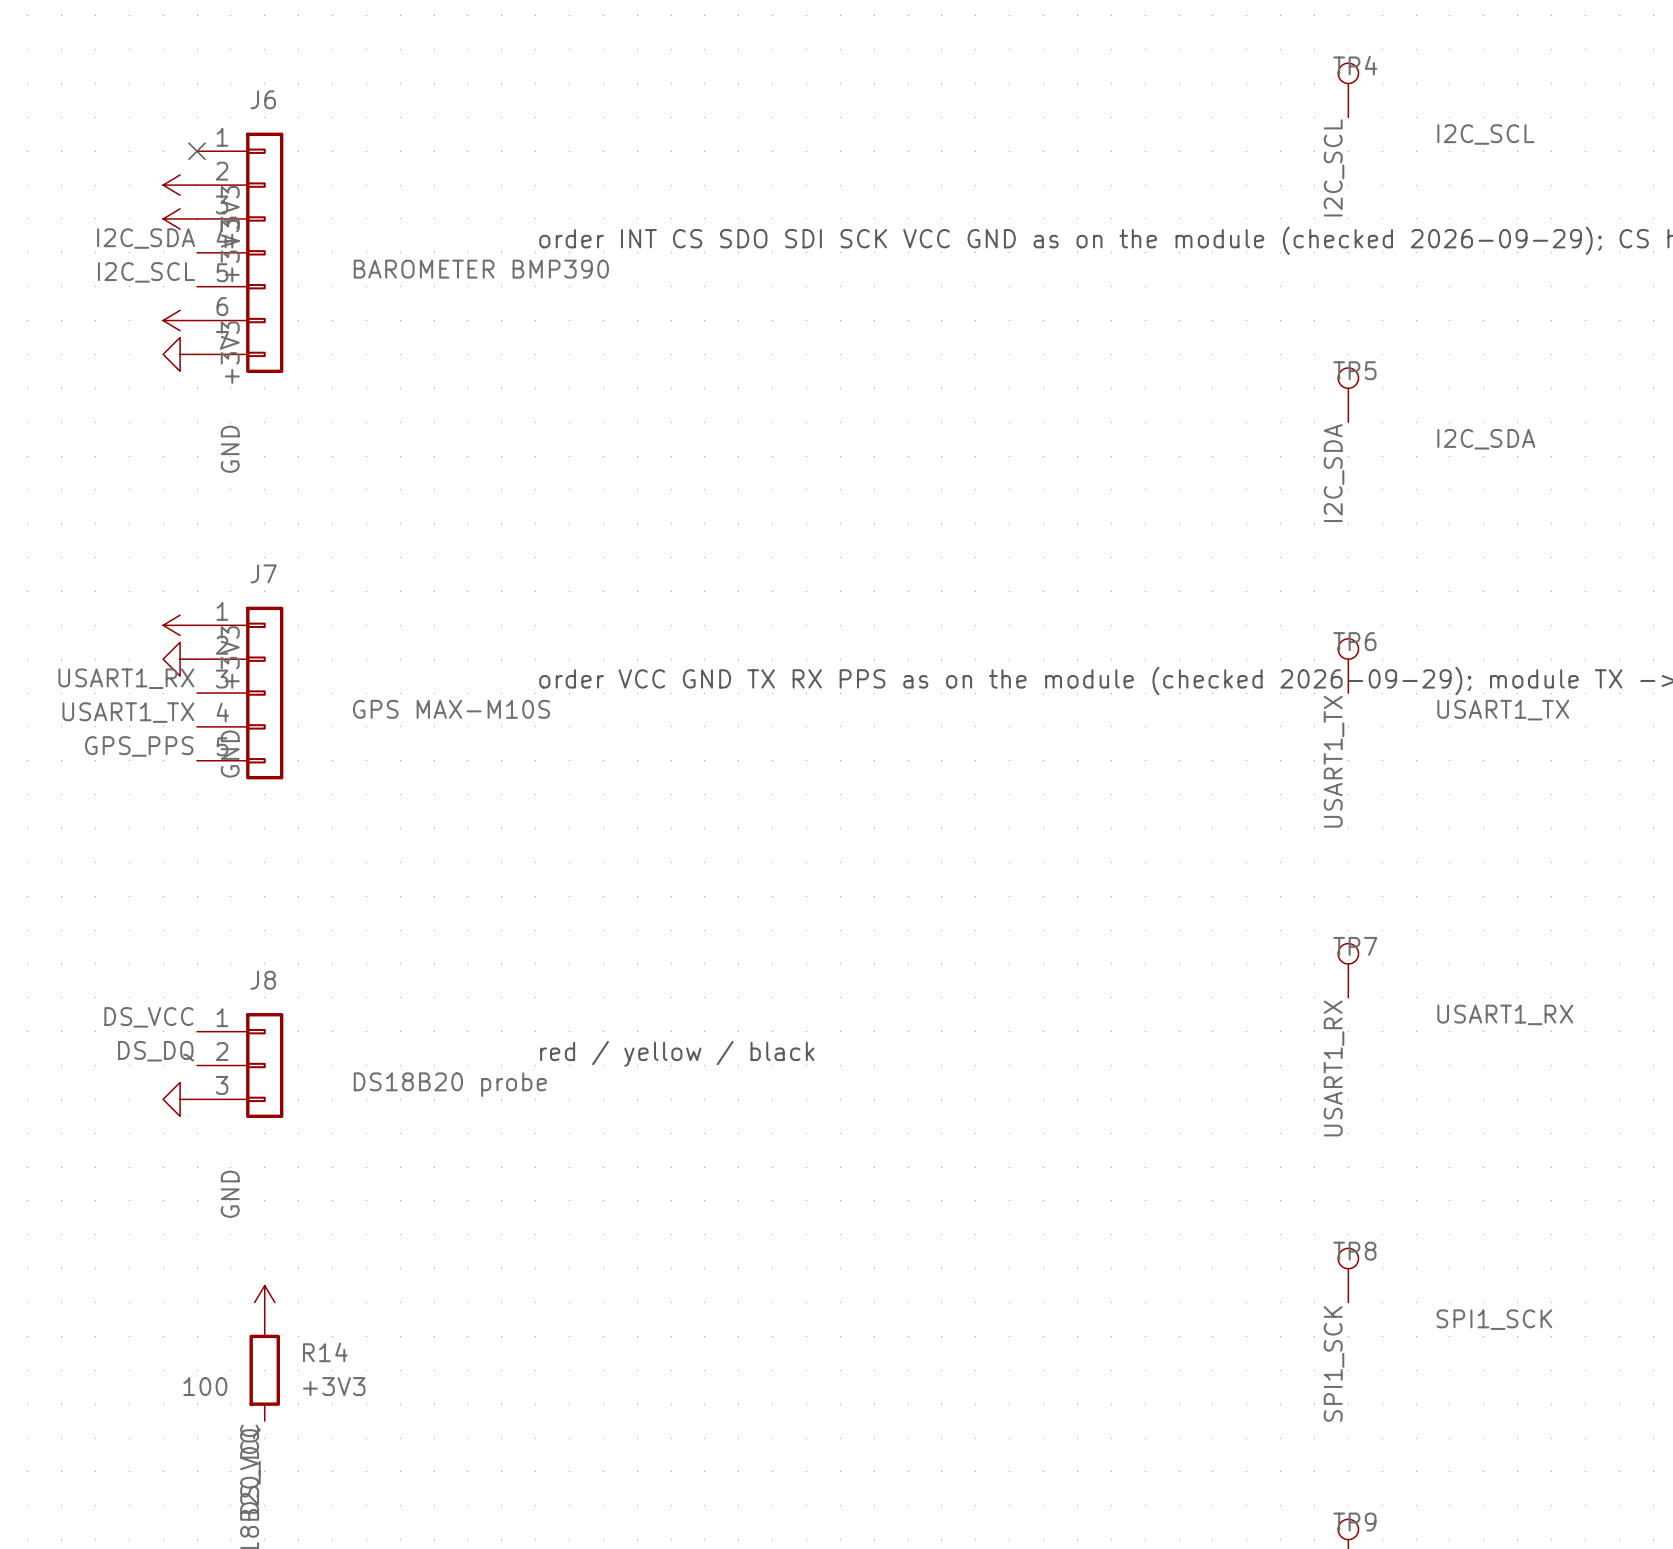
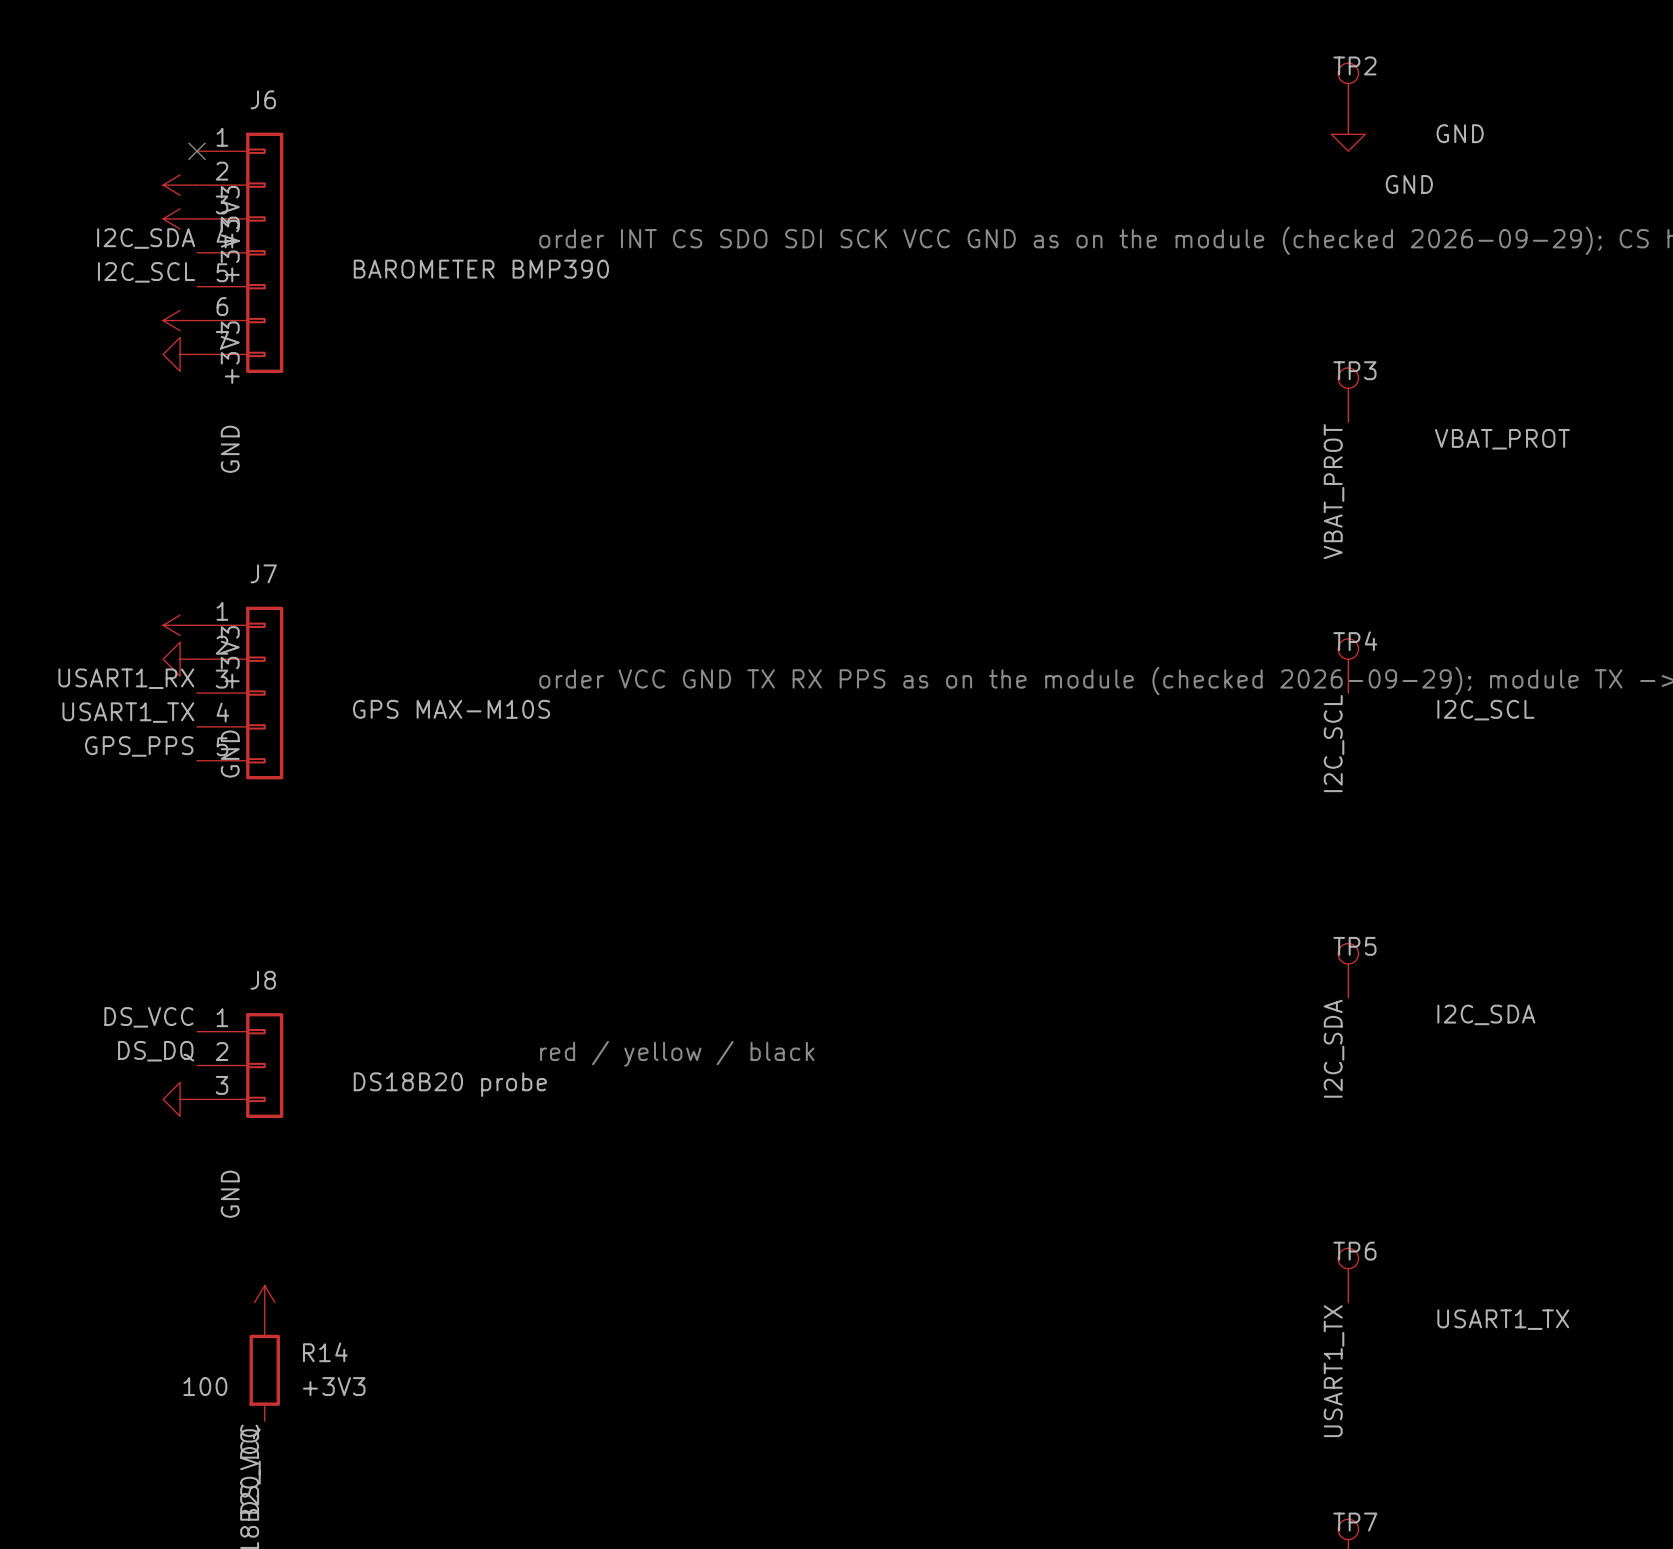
TP4 name: TP4 (1355, 65) -> TP2 (1354, 65)
power symbol: none -> GND (1348, 134)
TP4 value: I2C_SCL (1485, 134) -> GND (1460, 133)
label: I2C_SCL (1334, 167) -> none
TP5 name: TP5 (1354, 370) -> TP3 (1354, 370)
TP5 value: I2C_SDA (1486, 439) -> VBAT_PROT (1502, 439)
label: I2C_SDA (1334, 473) -> VBAT_PROT (1334, 491)
TP6 name: TP6 (1354, 641) -> TP4 (1355, 641)
TP6 value: USART1_TX (1503, 710) -> I2C_SCL (1485, 710)
label: USART1_TX (1334, 761) -> I2C_SCL (1334, 743)
TP7 name: TP7 (1355, 946) -> TP5 (1354, 946)
TP7 value: USART1_RX (1505, 1014) -> I2C_SDA (1486, 1014)
label: USART1_RX (1334, 1068) -> I2C_SDA (1334, 1048)
TP8 name: TP8 (1354, 1251) -> TP6 (1354, 1251)
TP8 value: SPI1_SCK (1494, 1319) -> USART1_TX (1503, 1319)
label: SPI1_SCK (1334, 1363) -> USART1_TX (1334, 1371)
TP9 name: TP9 (1354, 1522) -> TP7 (1355, 1522)

